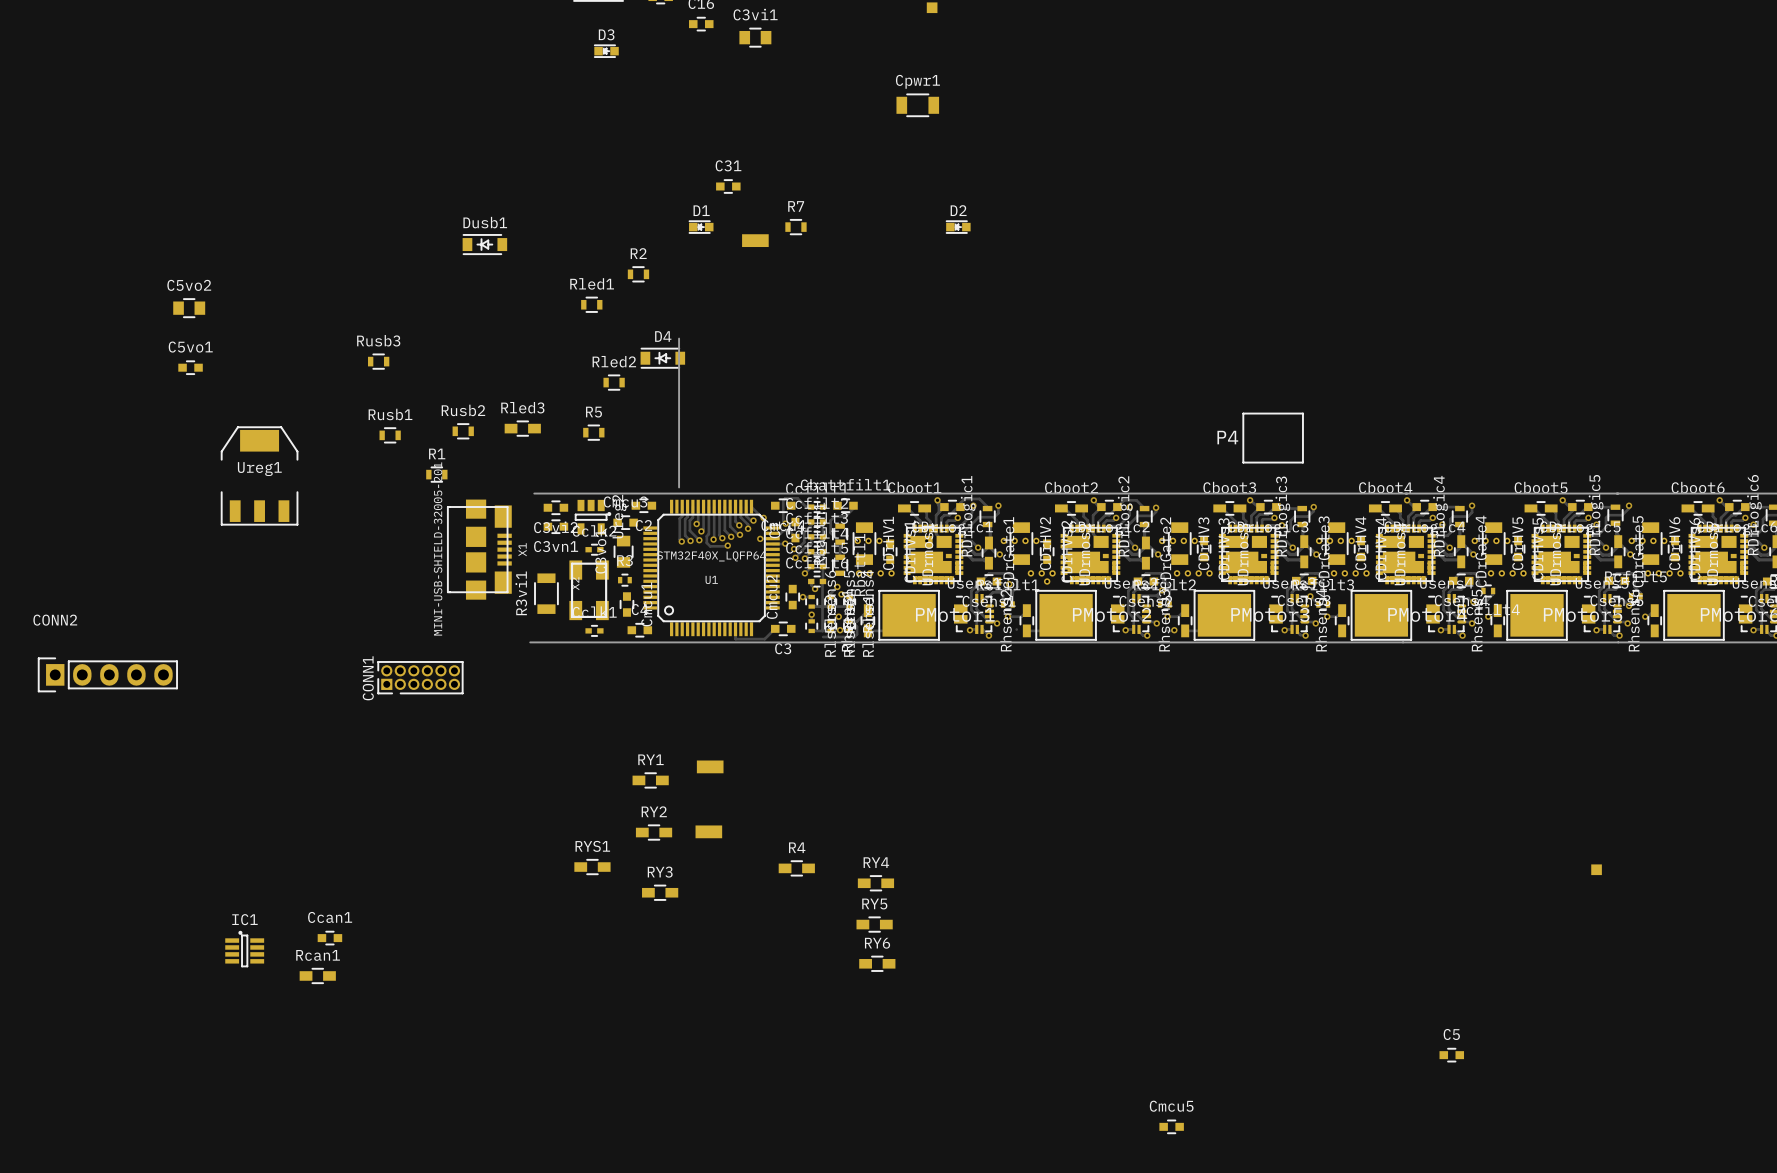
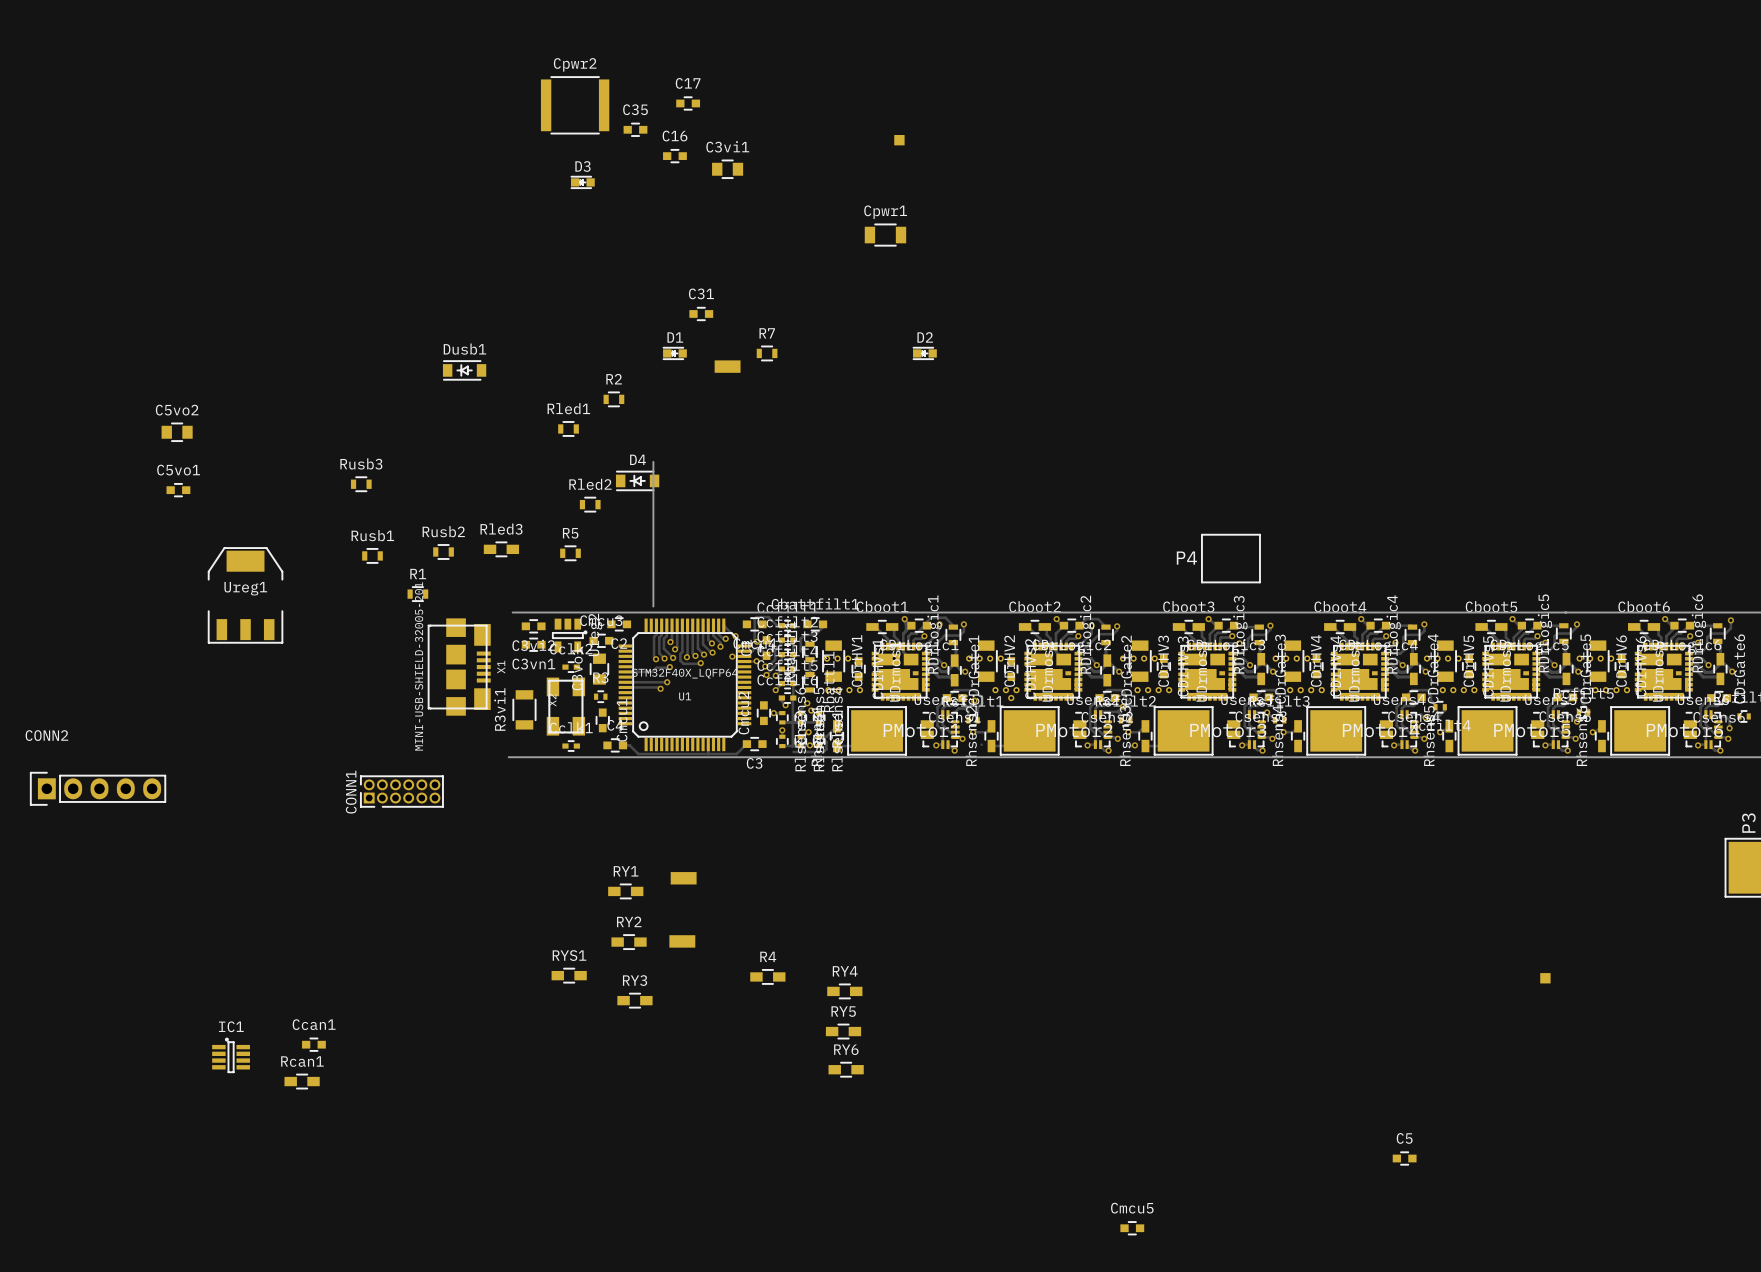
track: none -> (669, 667) (656, 667) (652, 671) (625, 671)
via: none -> (669, 667)
track: none -> (625, 682) (667, 682)
via: none -> (667, 682)
track: none -> (625, 687) (660, 688)
via: none -> (660, 688)
track: none -> (623, 745) (629, 745) (638, 754) (708, 753)

